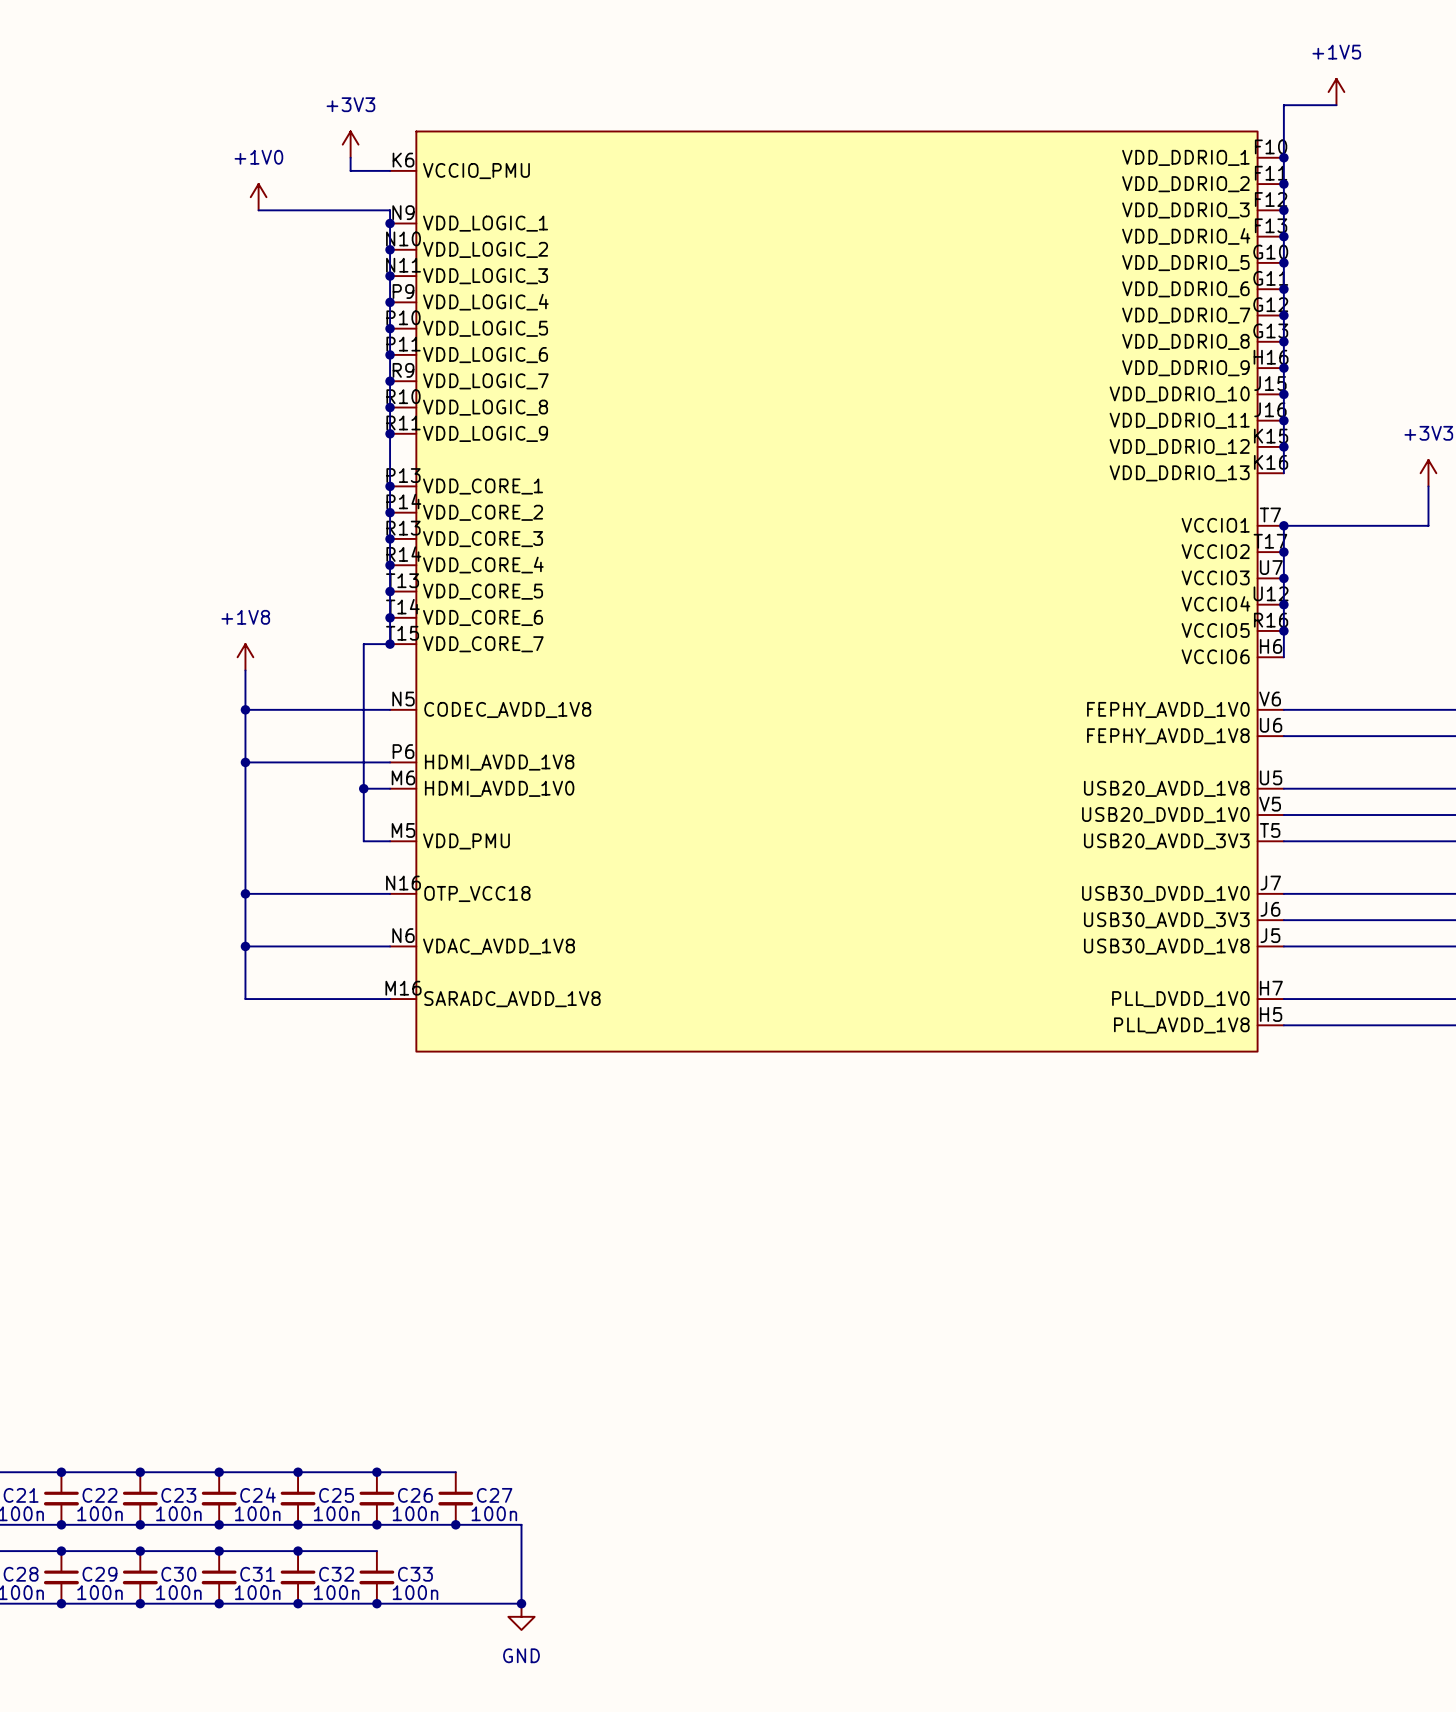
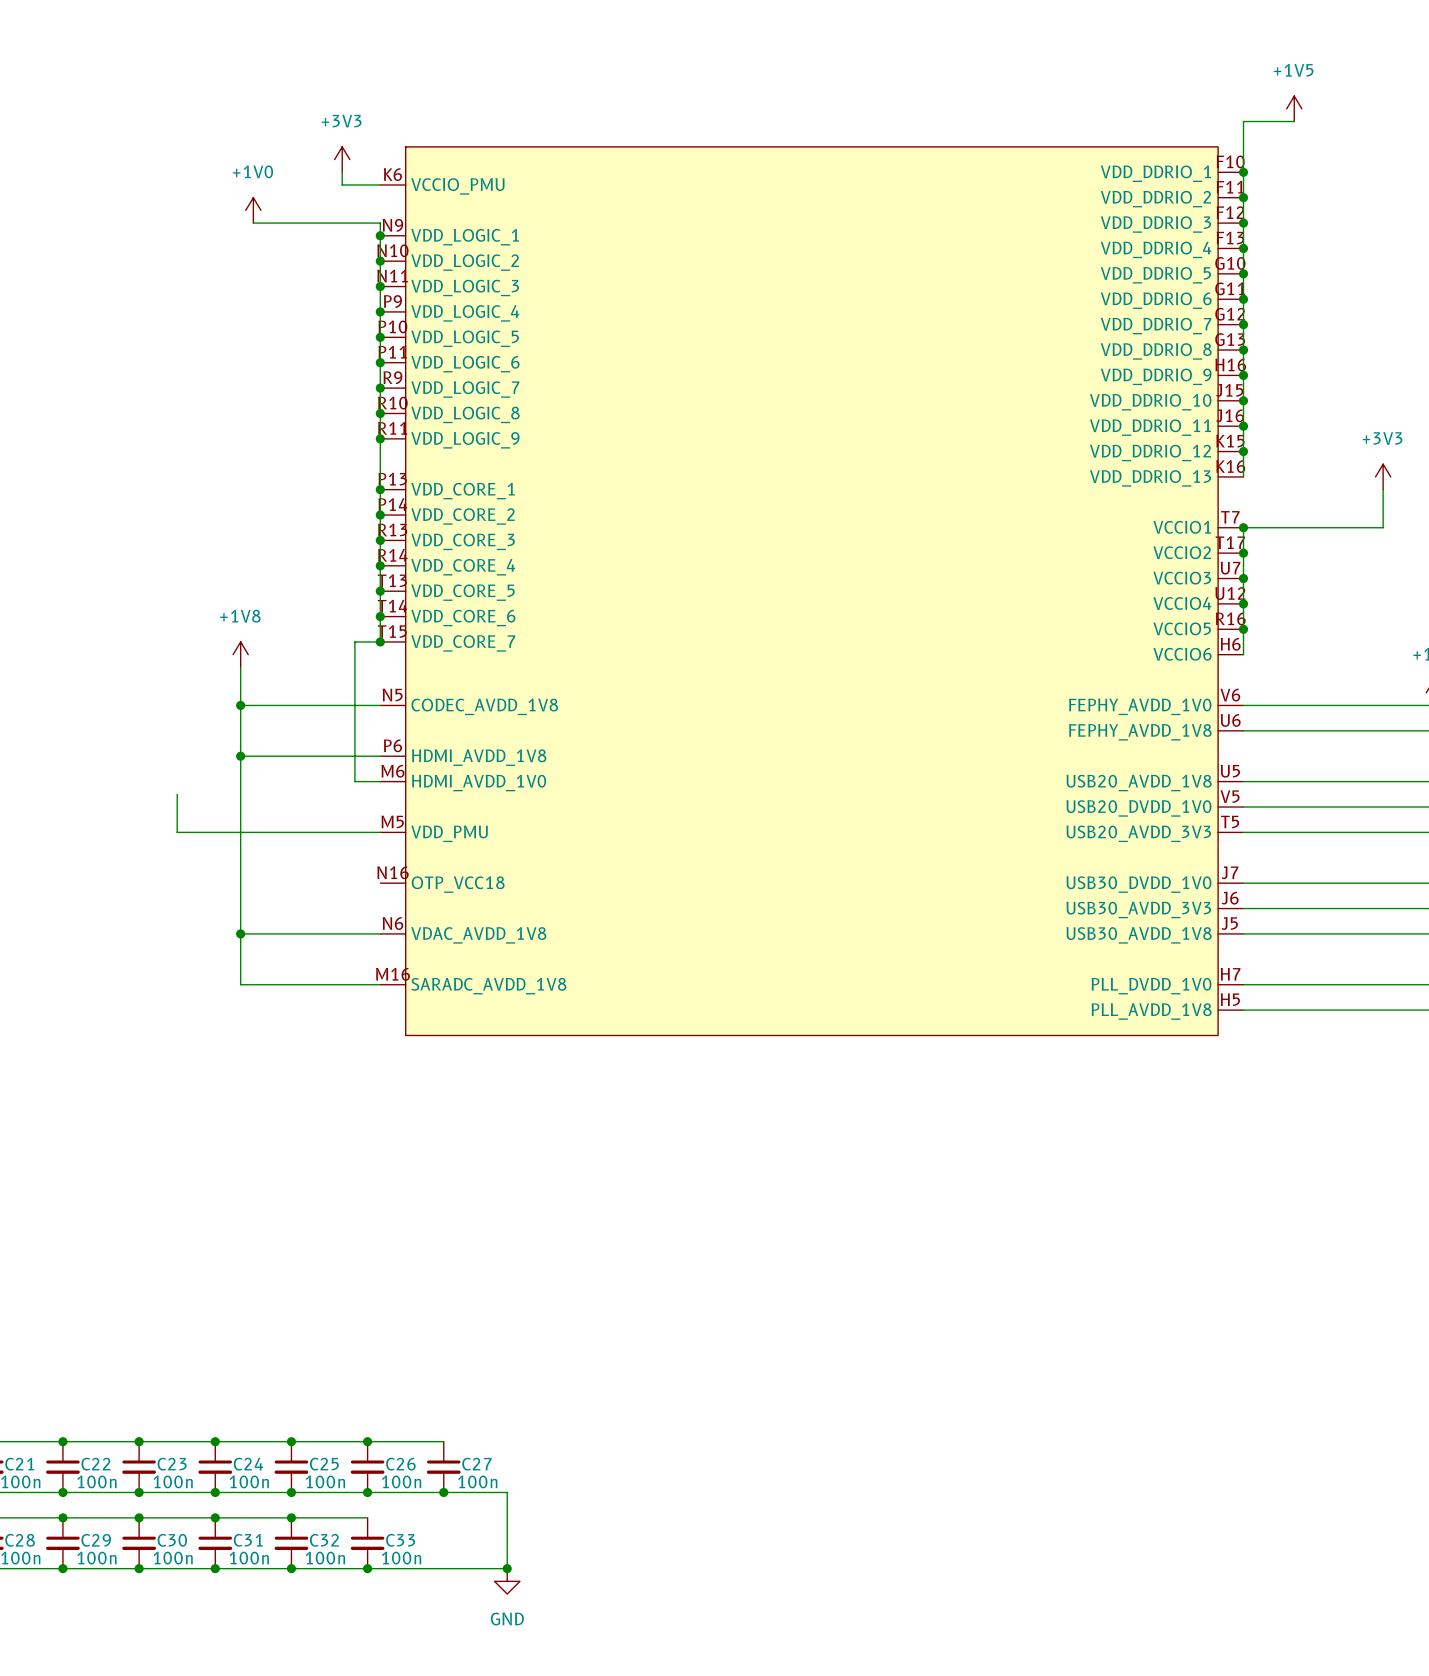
wire: (363, 788) (363, 841) -> (177, 794) (177, 832) (354, 832)
junction: (363, 788) -> none
wire: (245, 893) (390, 893) -> none
junction: (245, 893) -> none

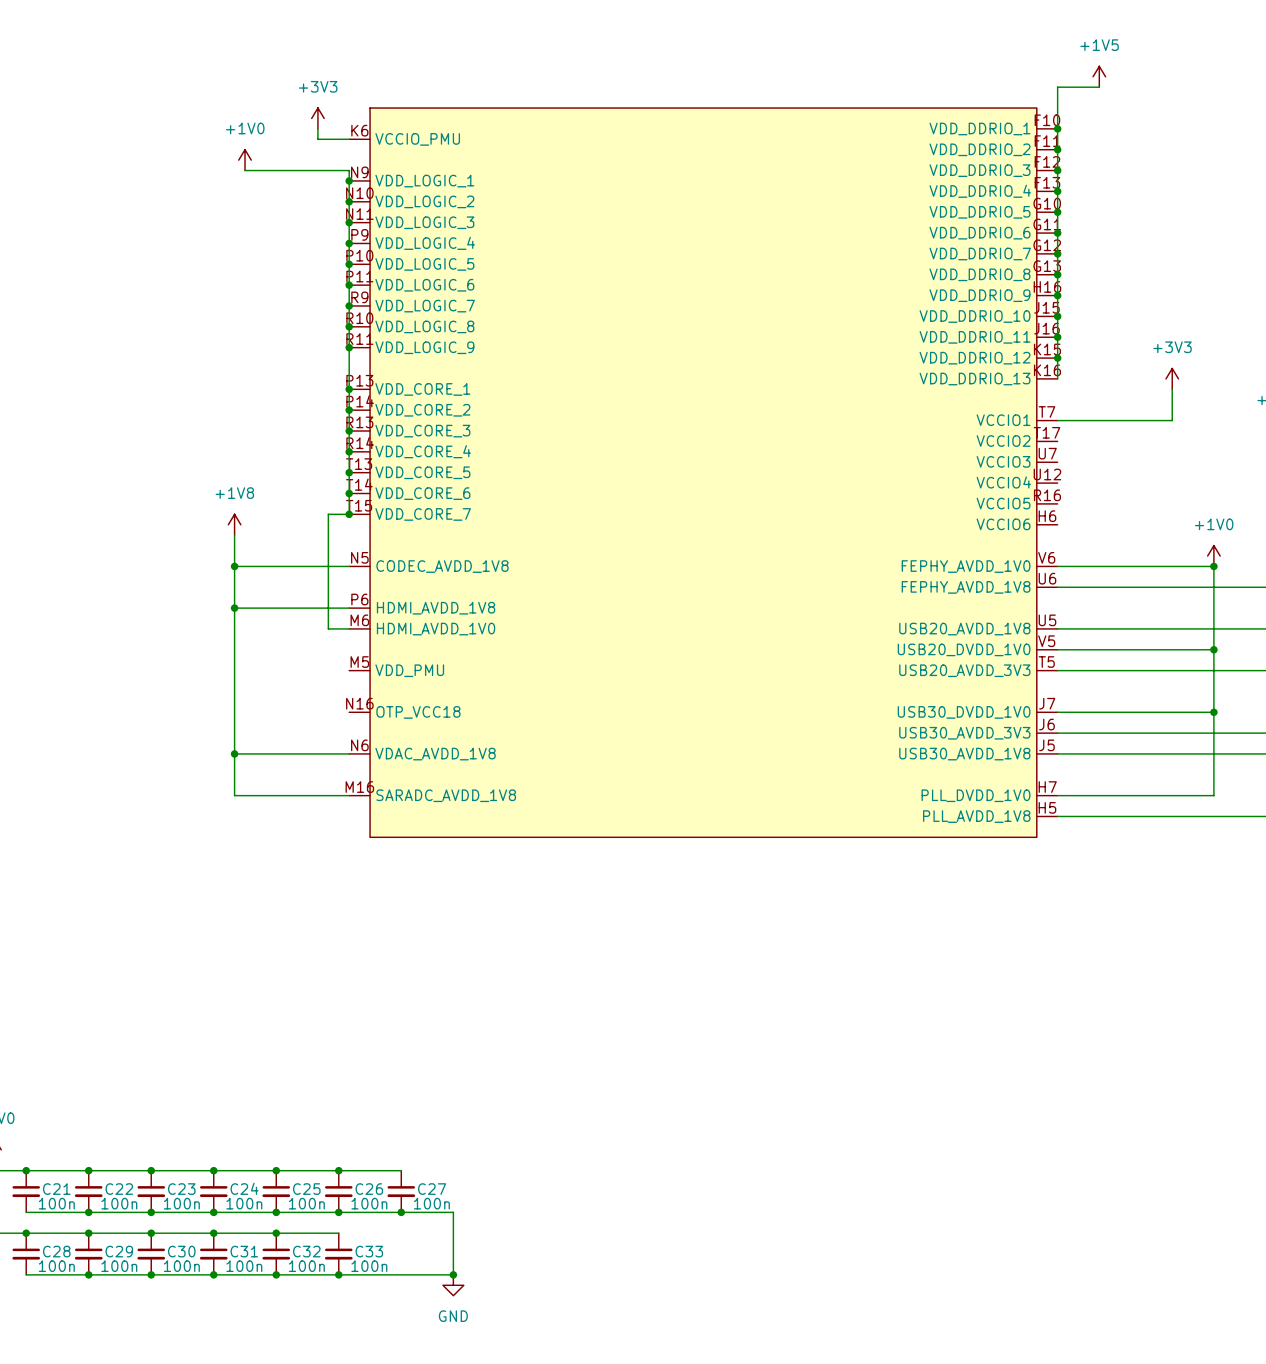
wire: (1243, 527) (1243, 654) -> none
junction: (1243, 527) -> none
junction: (1243, 553) -> none
junction: (1243, 578) -> none
junction: (1243, 603) -> none
junction: (1243, 629) -> none
wire: (177, 794) (177, 832) (380, 832) -> none

